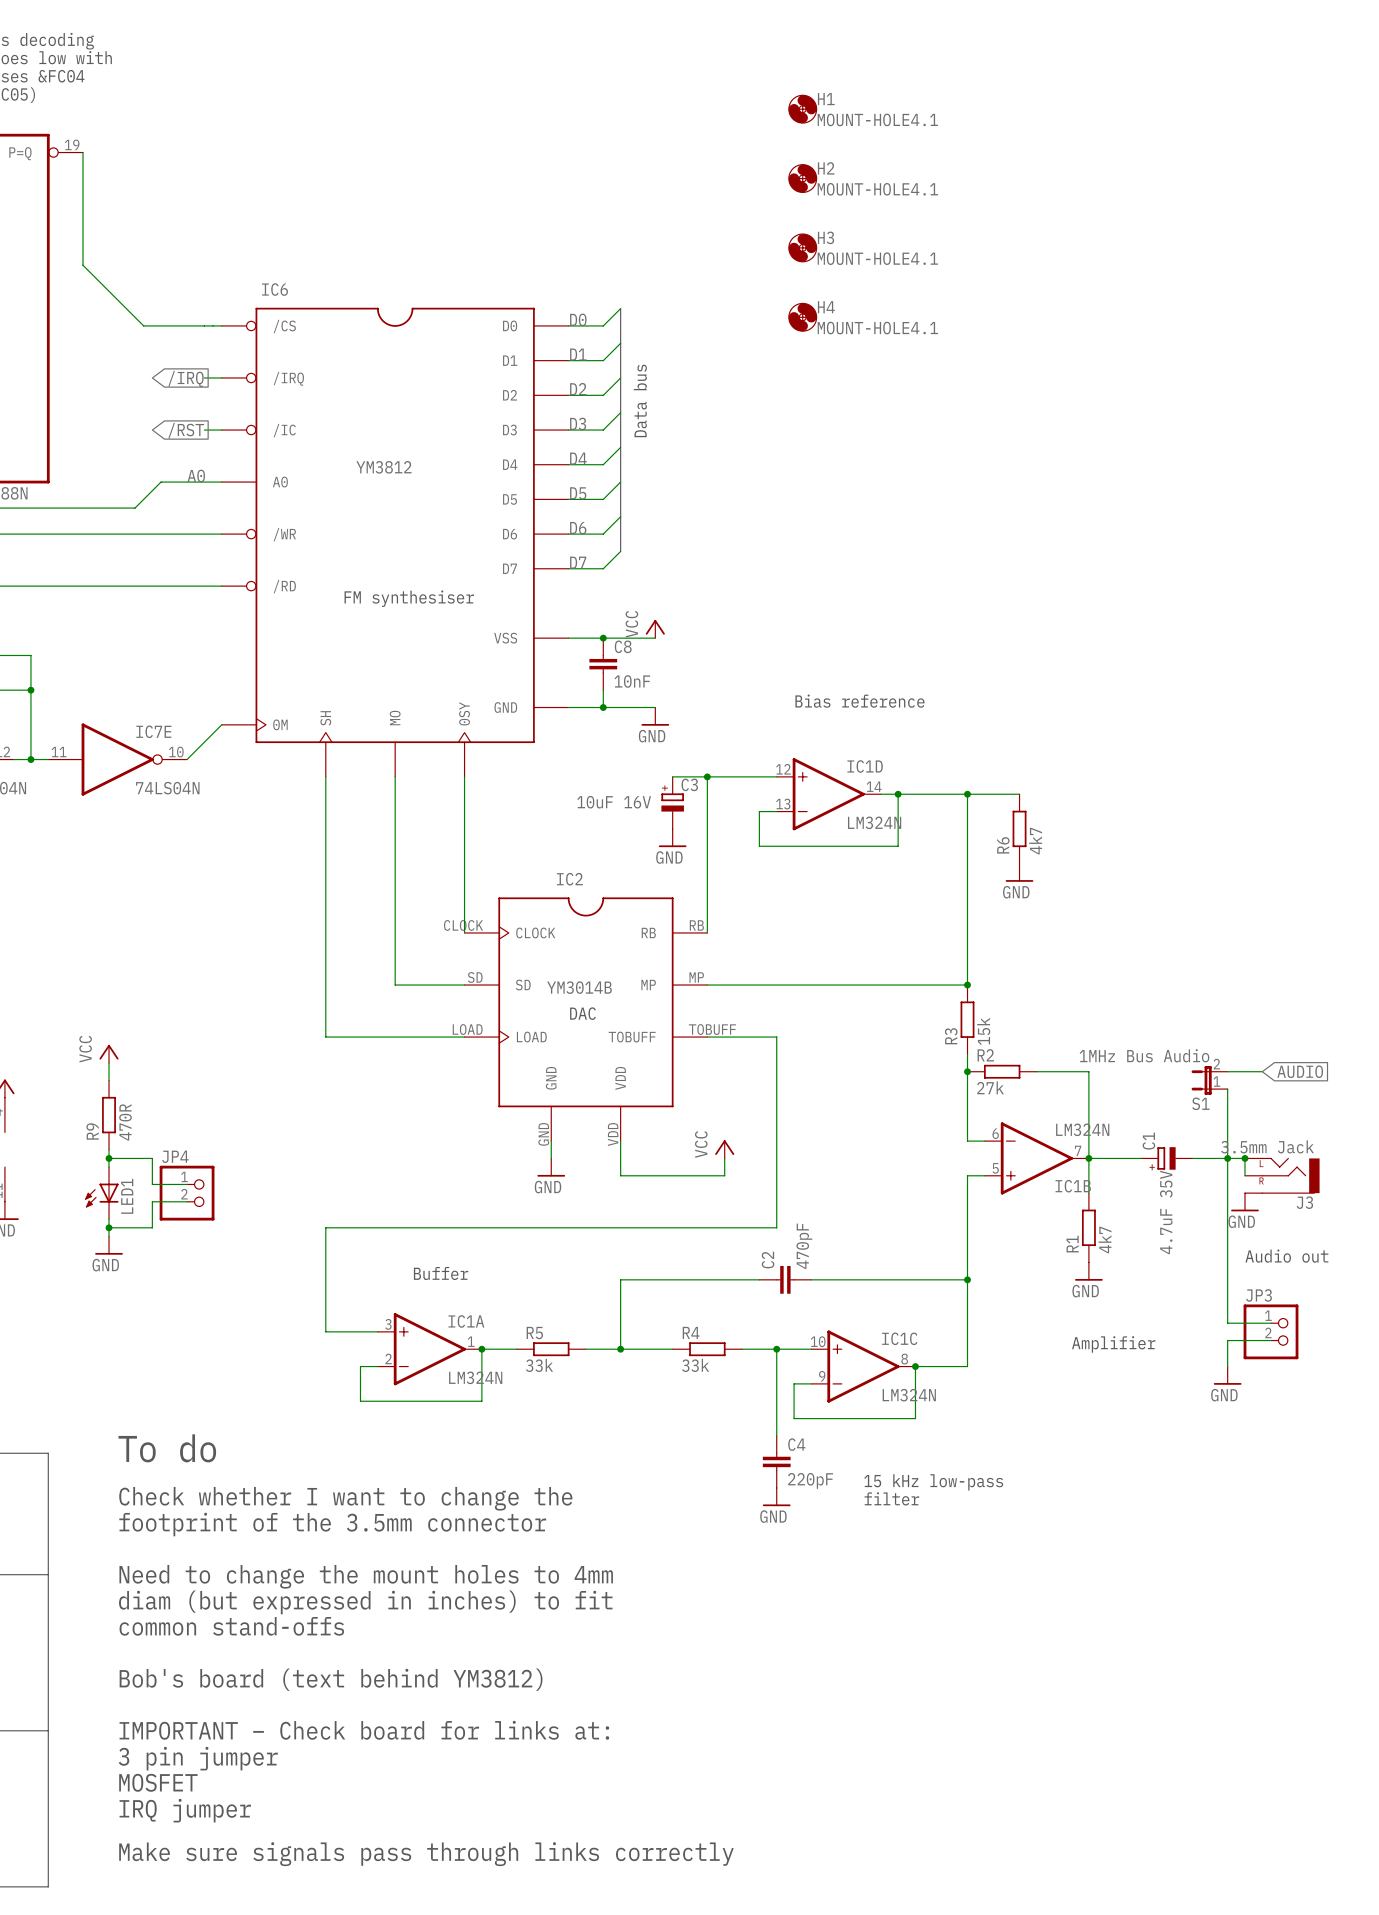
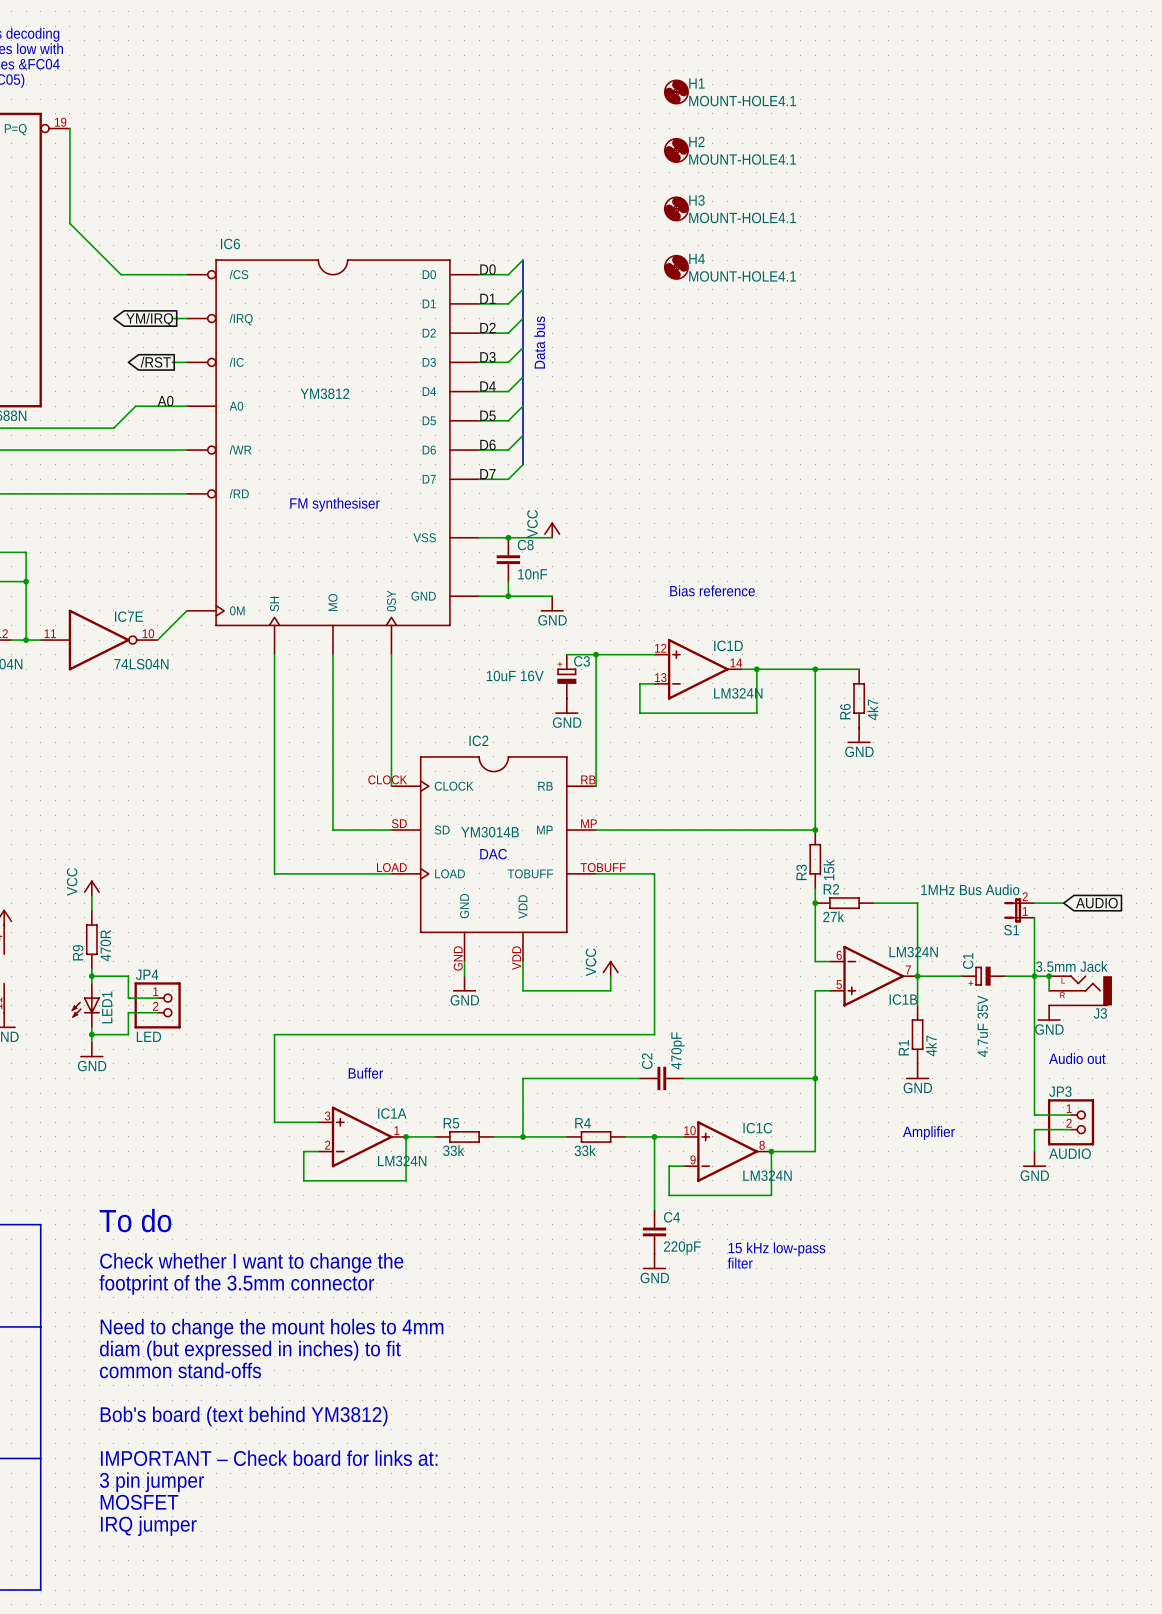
global label: /IRQ (185, 378) -> YM/IRQ (149, 319)
JP4 value: none -> LED (148, 1036)
JP3 value: none -> AUDIO (1070, 1153)
text: Make sure signals pass through links correctly (426, 1854) -> none

